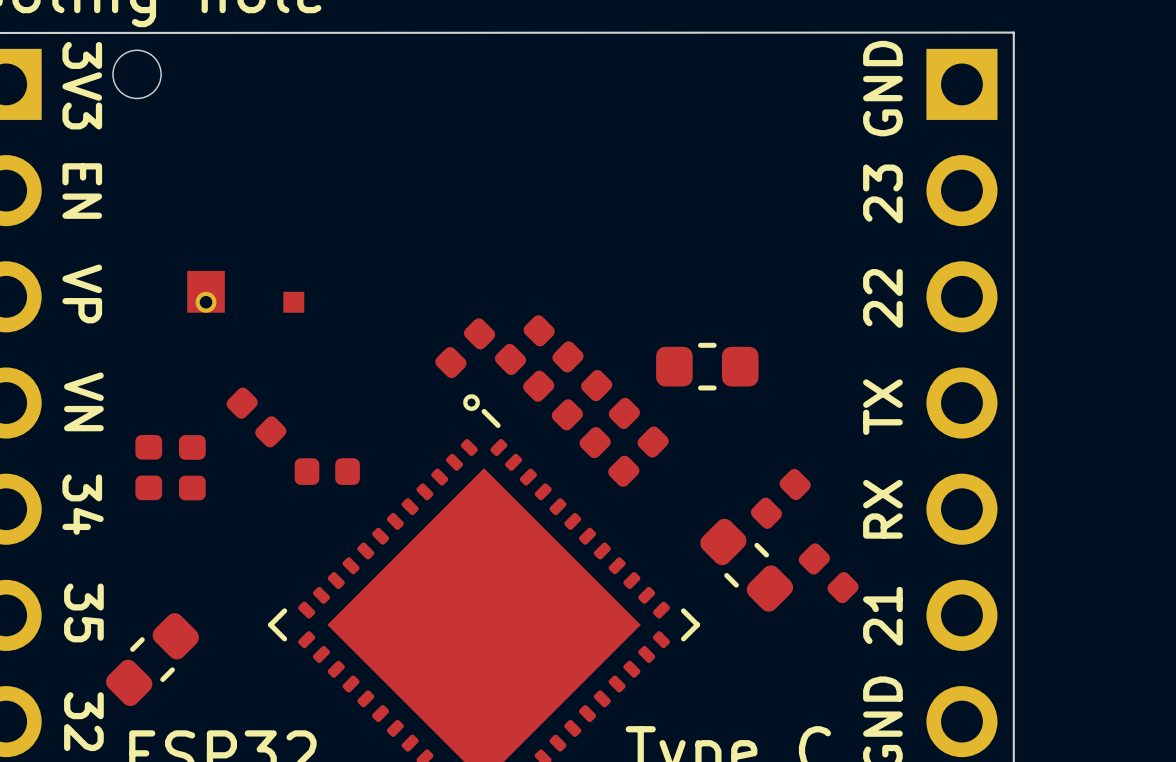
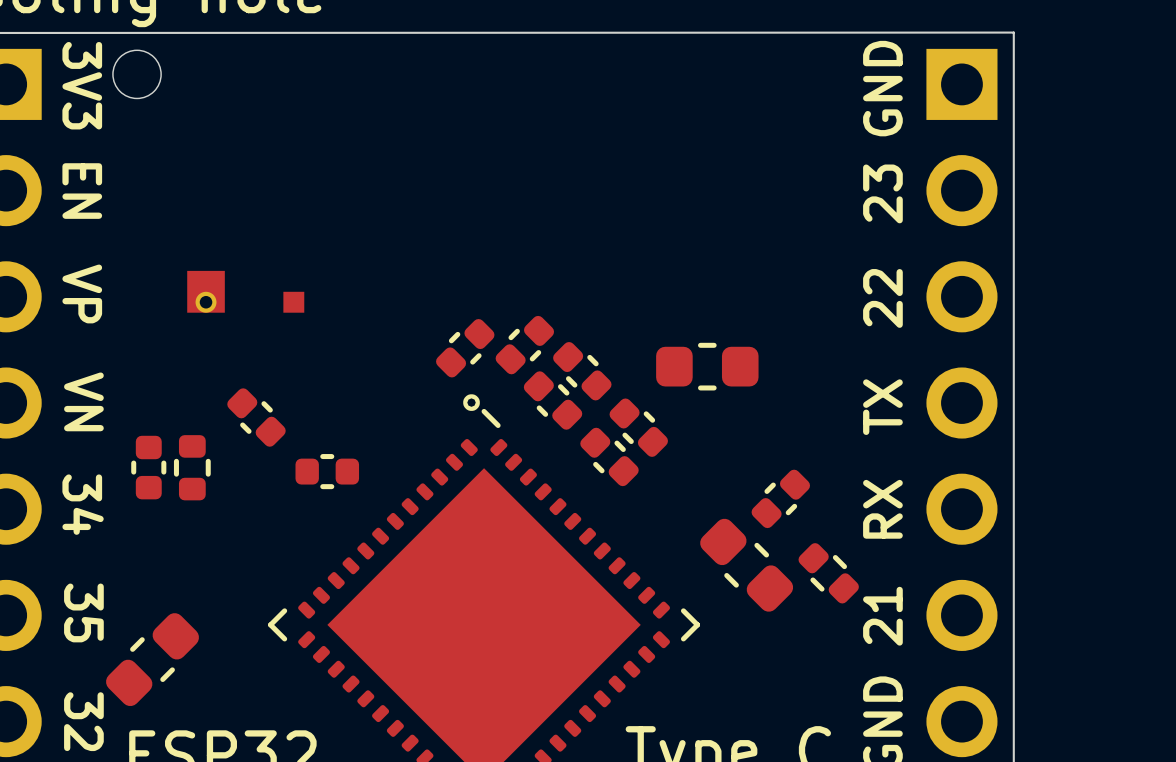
part footprint: [494, 315, 555, 376] -> [495, 315, 555, 375]
part footprint: [435, 318, 496, 379] -> [436, 319, 495, 378]
part footprint: [552, 341, 613, 402] -> [553, 342, 612, 401]
part footprint: [523, 370, 584, 431] -> [523, 371, 583, 430]
part footprint: [226, 387, 287, 448] -> [227, 388, 286, 447]
part footprint: [608, 397, 669, 458] -> [609, 398, 668, 457]
part footprint: [579, 426, 640, 487] -> [580, 427, 639, 487]
part footprint: [135, 434, 163, 501] -> [131, 435, 167, 500]
part footprint: [178, 435, 206, 501] -> [173, 435, 211, 501]
part footprint: [294, 458, 360, 485] -> [295, 454, 360, 490]
part footprint: [750, 468, 811, 529] -> [751, 469, 811, 529]
part footprint: [798, 543, 859, 604] -> [798, 543, 859, 604]

